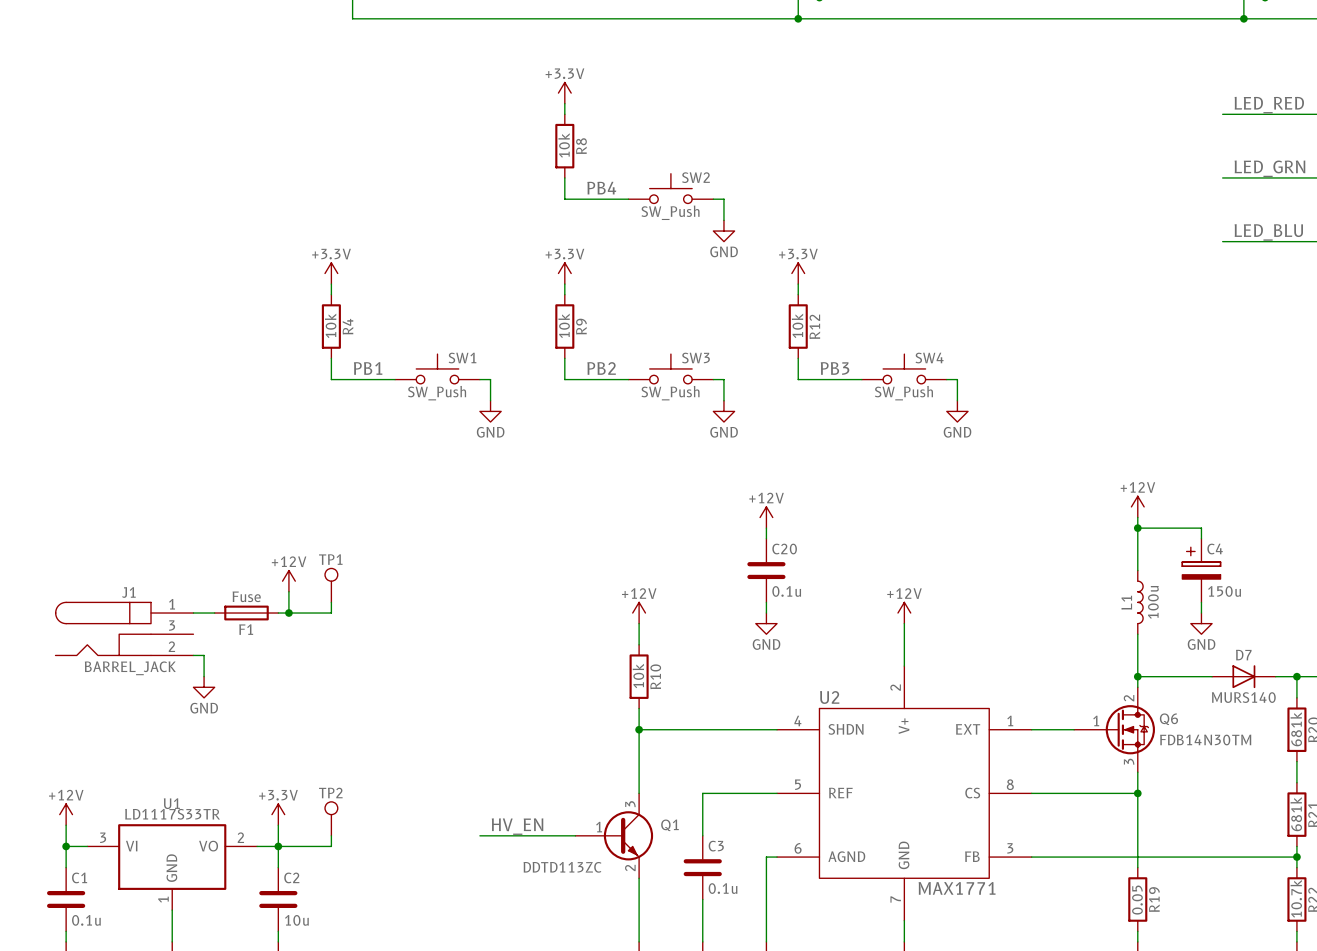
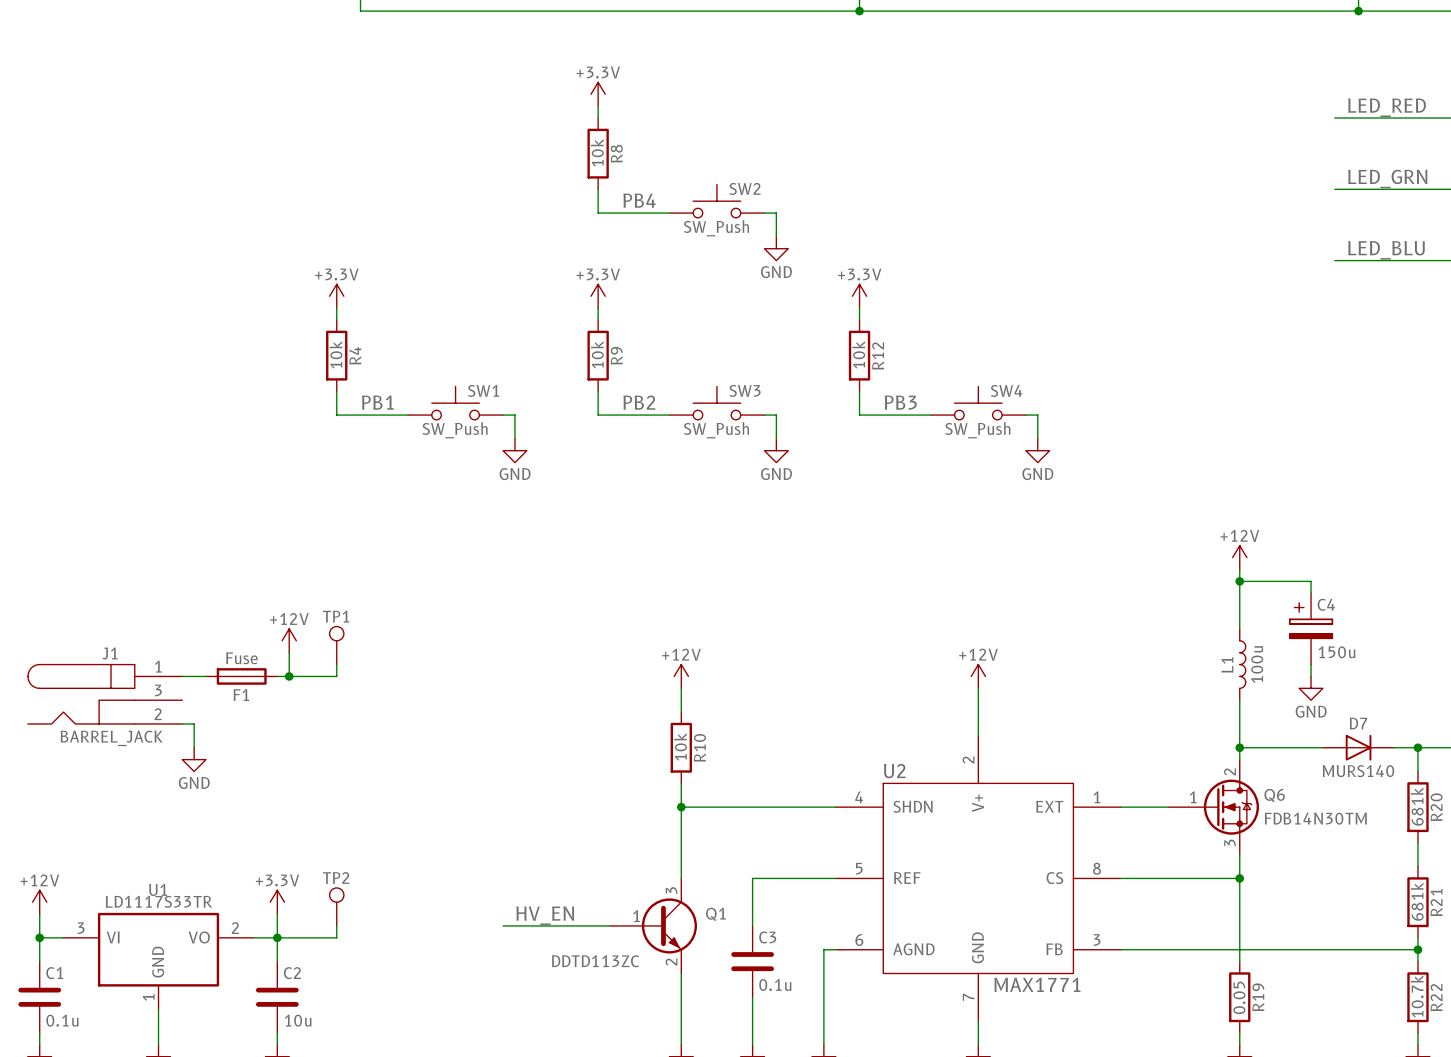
power symbol: +12V (766, 517) -> none
wire: (766, 528) (766, 538) -> none
C20: 0.1u (766, 570) -> none
wire: (766, 602) (766, 613) -> none
power symbol: GND (766, 623) -> none

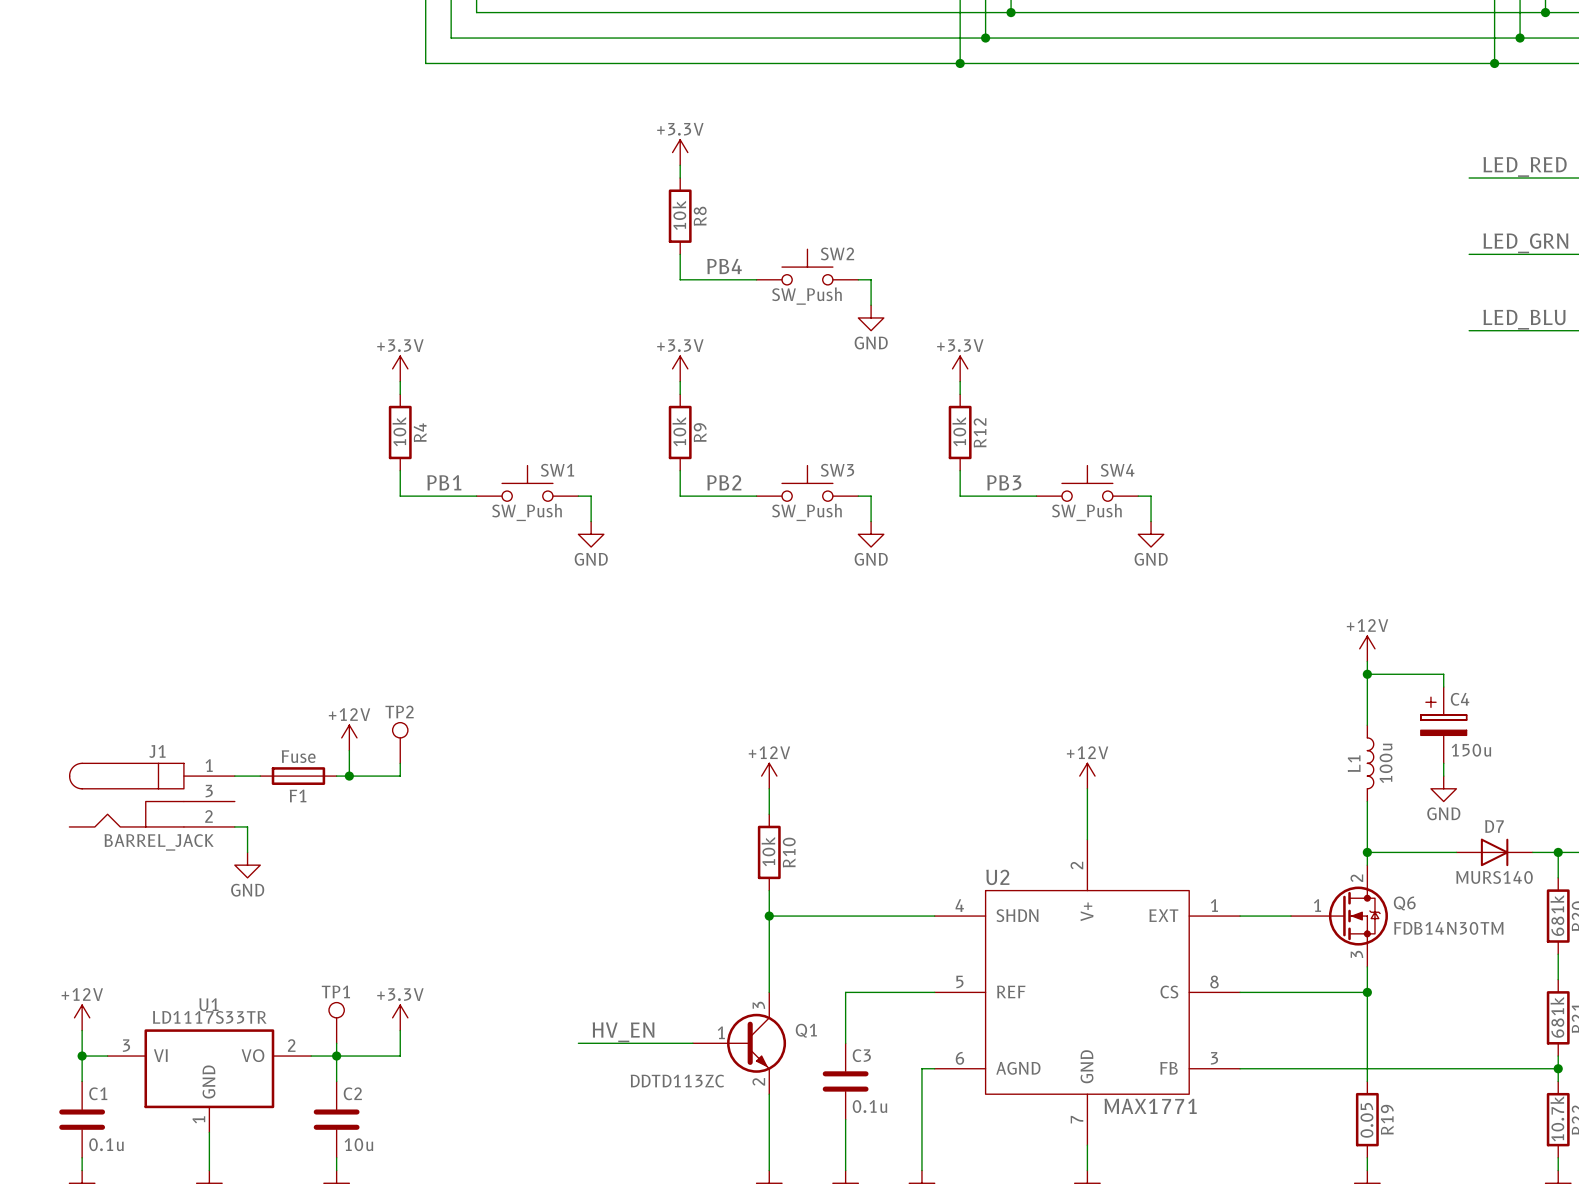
TP1 name: TP1 (336, 616) -> TP2 (399, 711)
power symbol position: +3.3V (277, 902) -> +3.3V (400, 1017)
TP1: none -> (336, 1022)
TP2: (336, 906) -> none

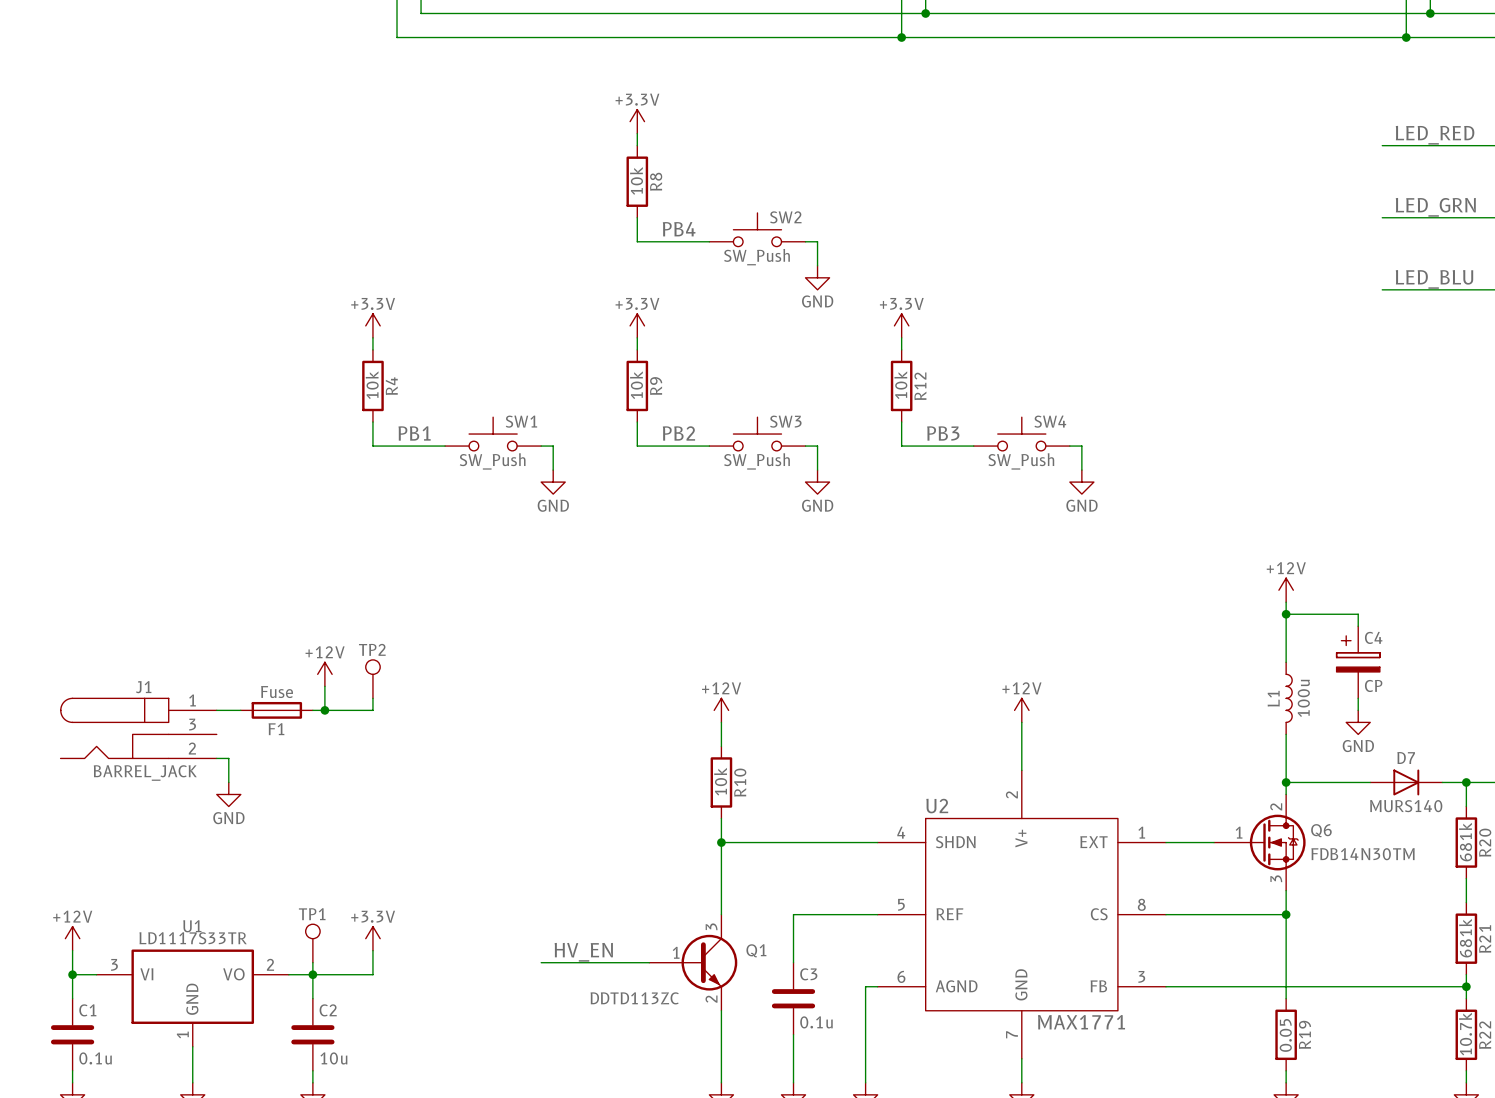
C4 value: 150u (1471, 750) -> CP (1373, 685)

